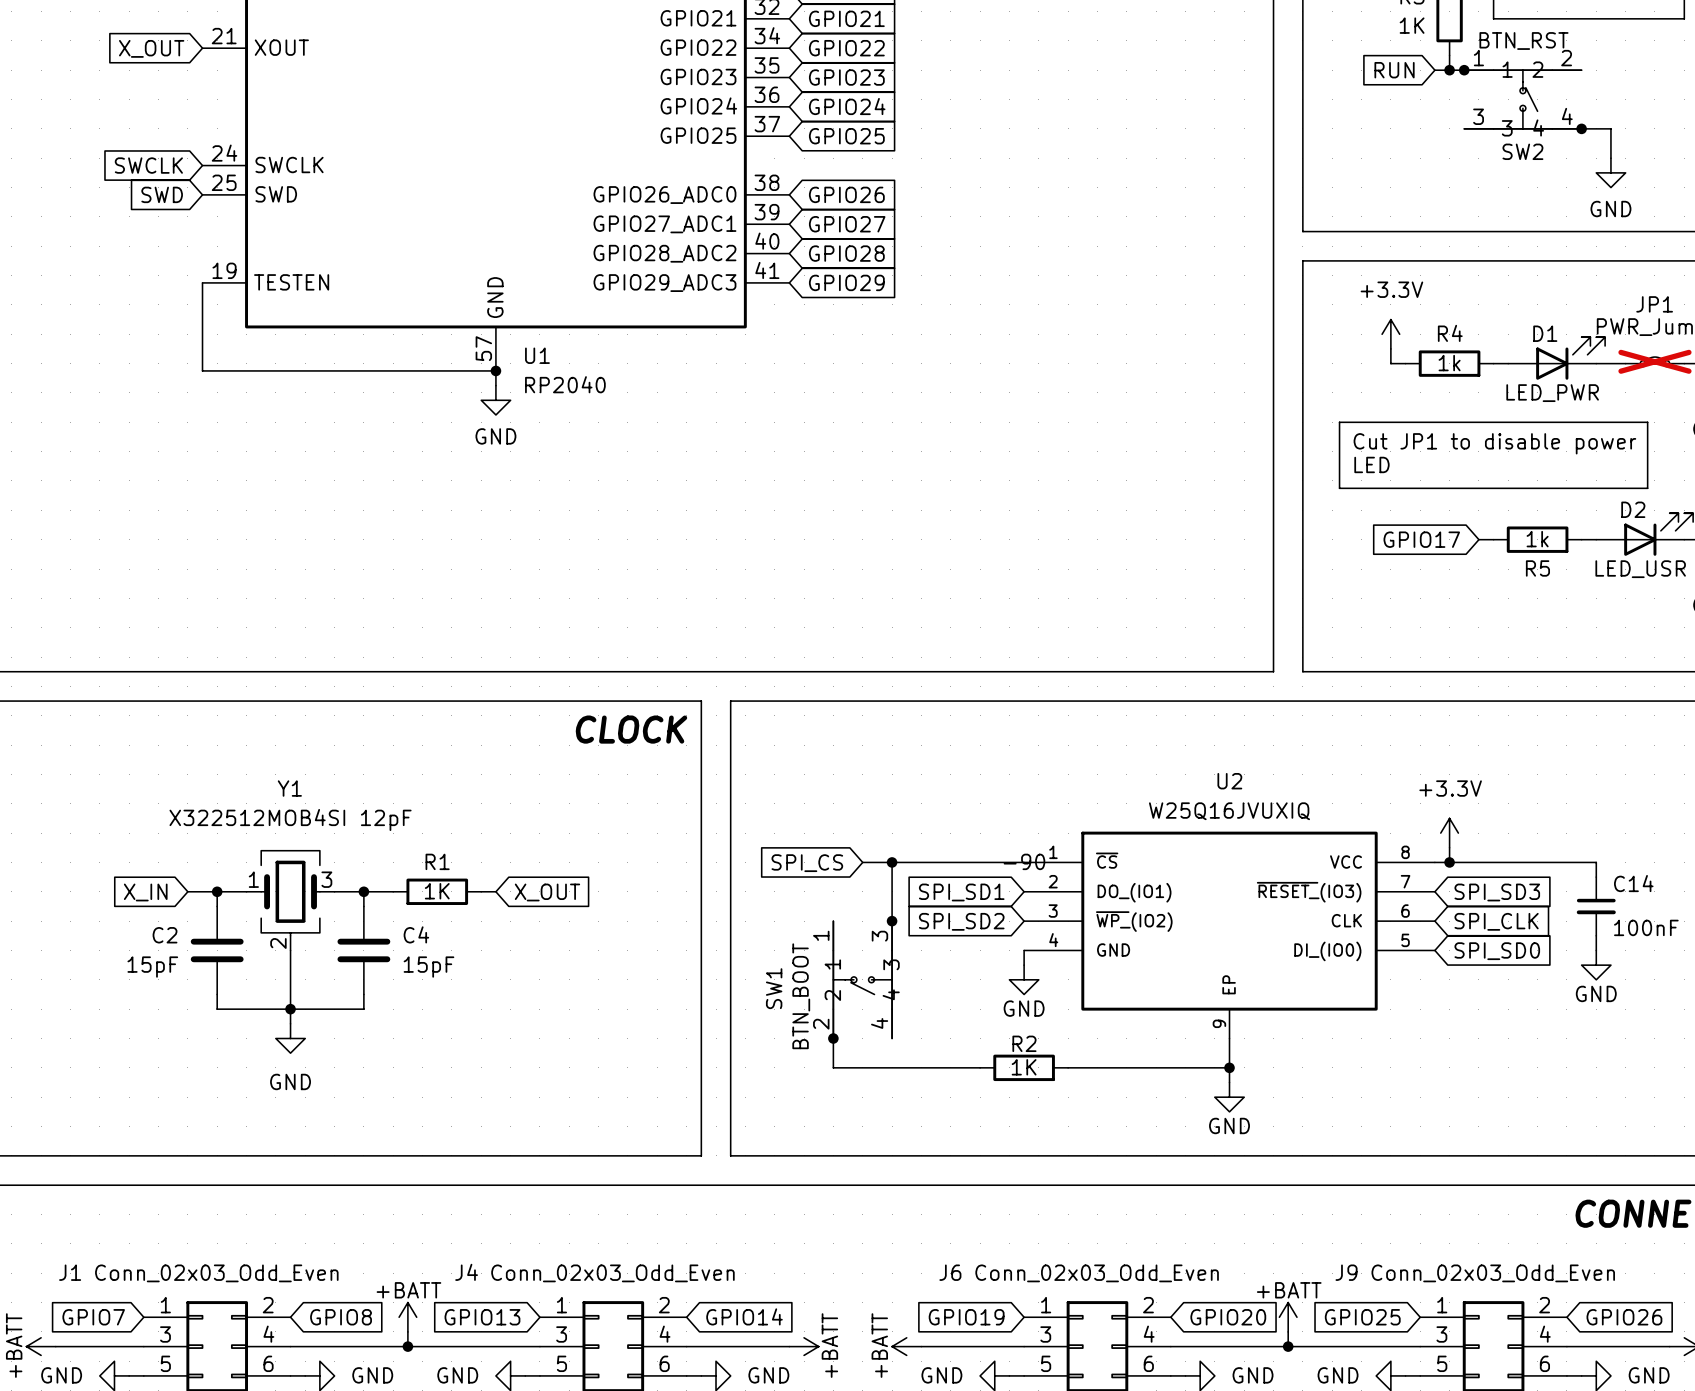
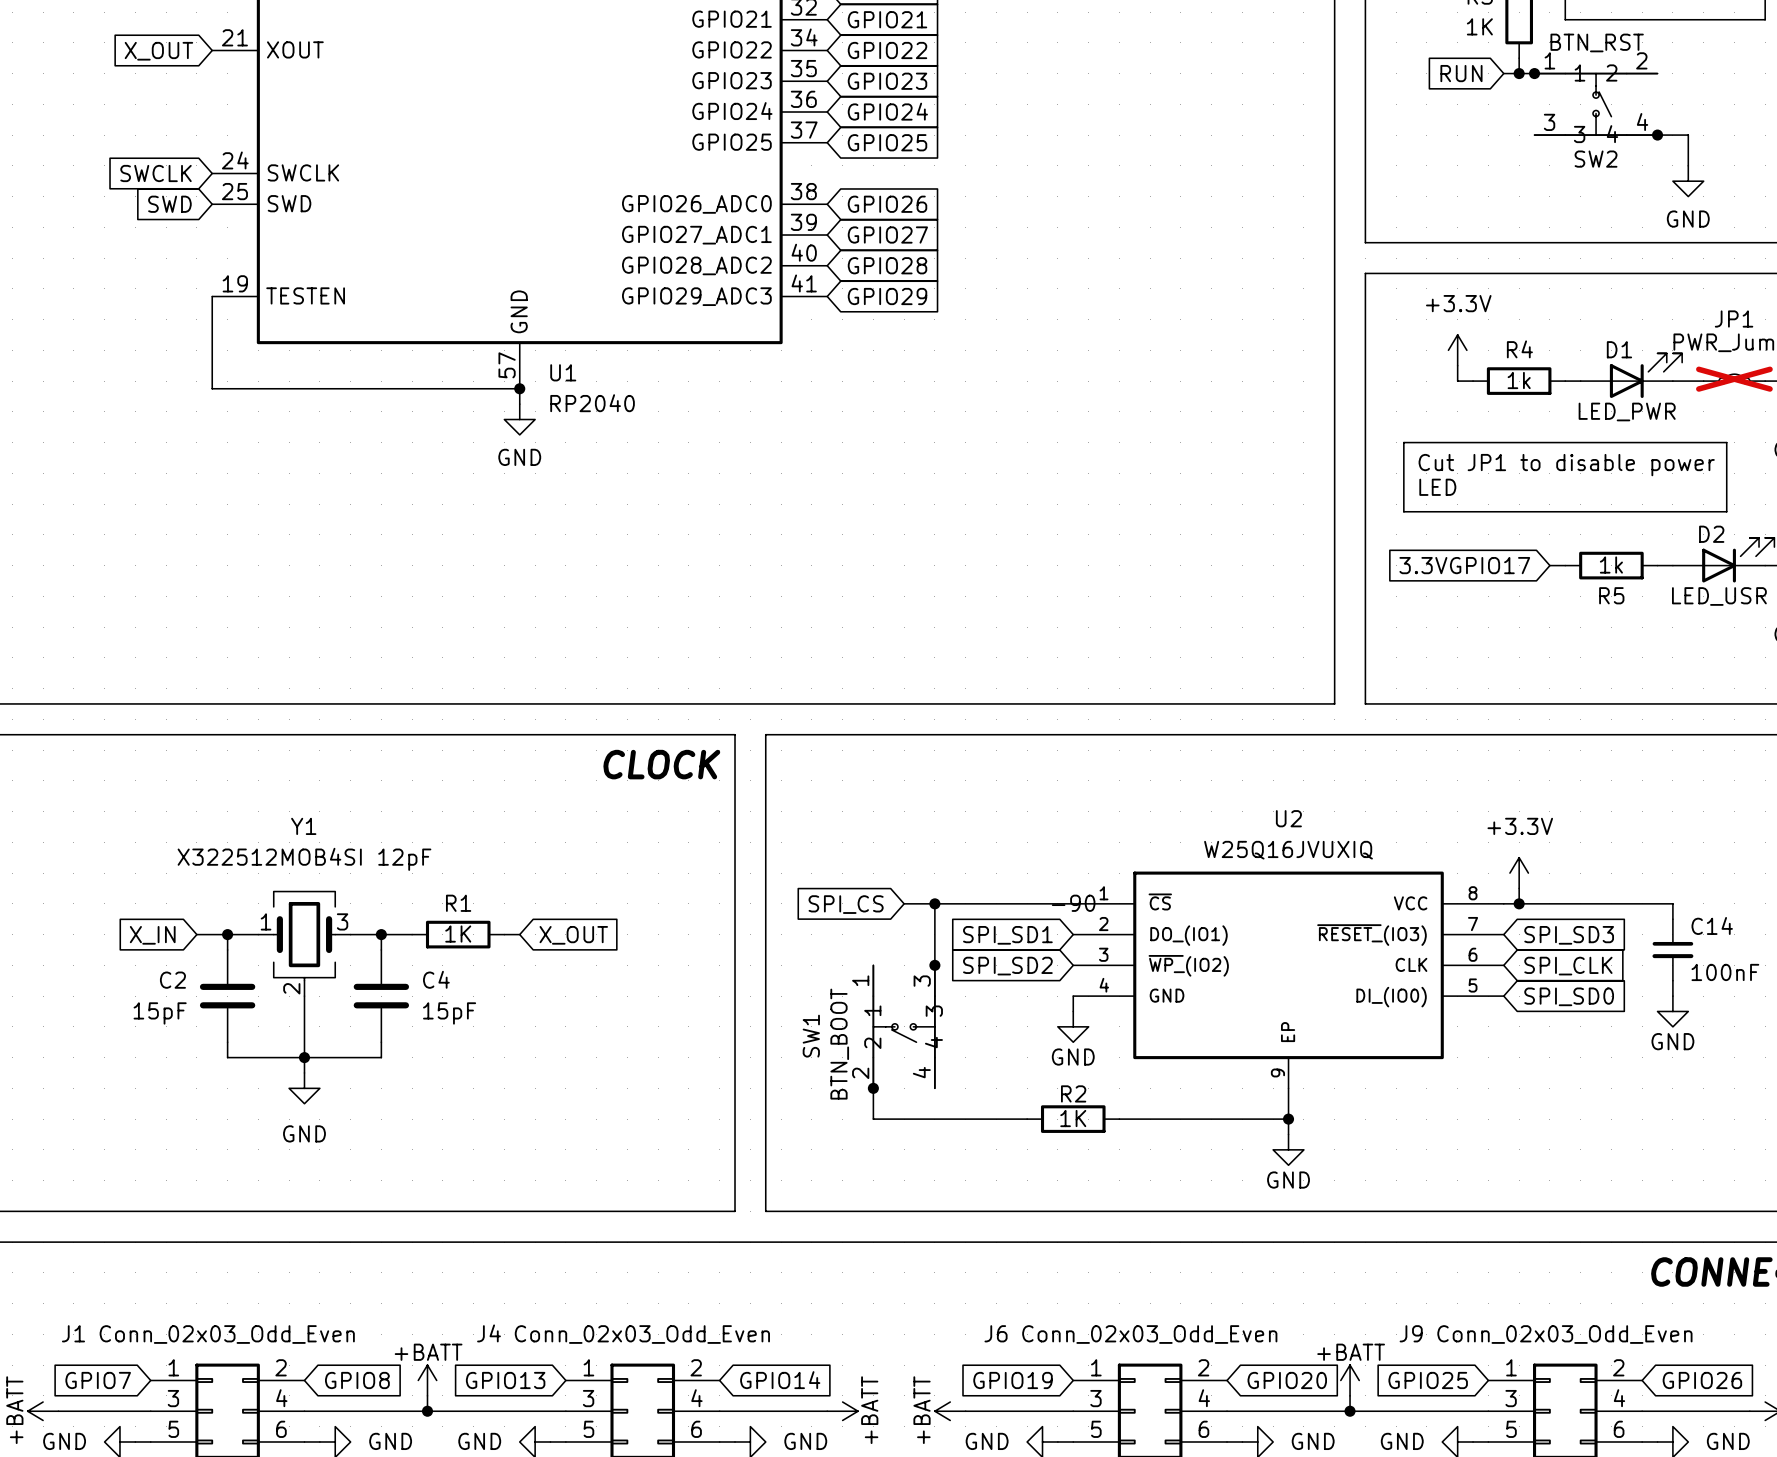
global label: GPIO17 (1421, 539) -> 3.3VGPIO17 (1464, 565)

